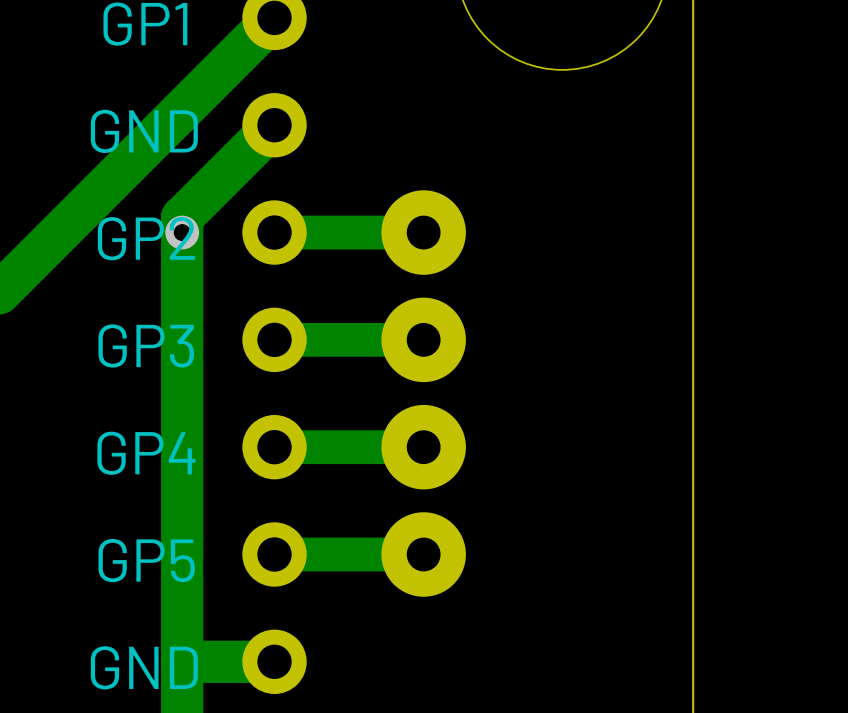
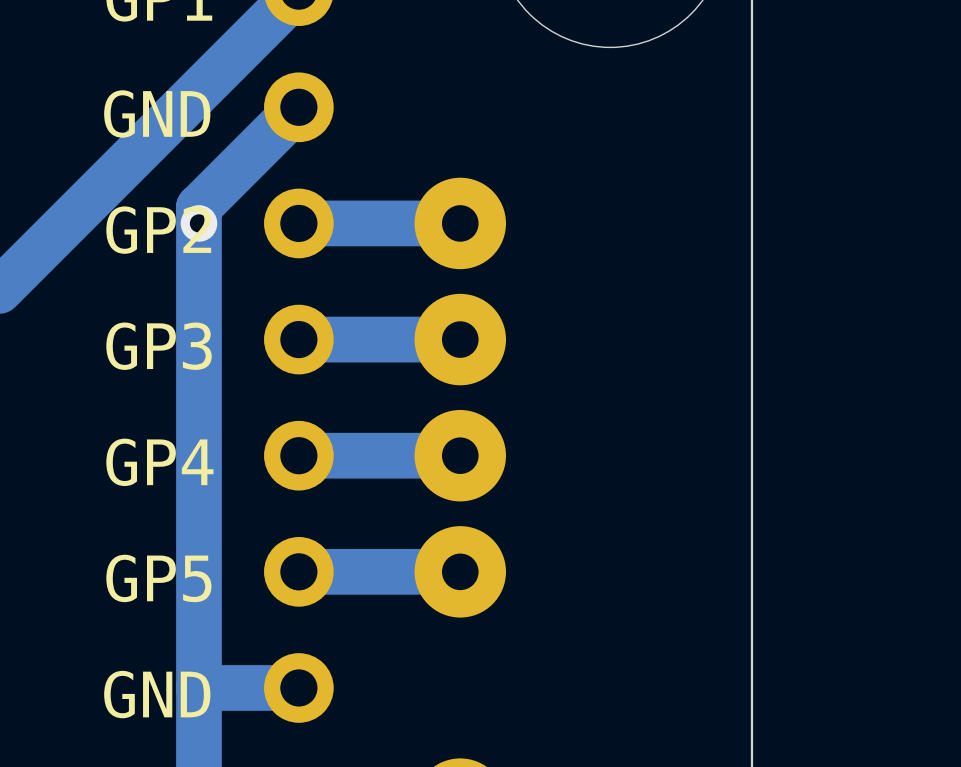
track width: thin (423, 232) (274, 232) -> thick (460, 223) (298, 223)
track width: thin (423, 339) (274, 339) -> thick (460, 339) (298, 339)
track width: thin (423, 447) (274, 447) -> thick (460, 455) (298, 455)
track width: thin (423, 554) (274, 554) -> thick (460, 571) (298, 571)

